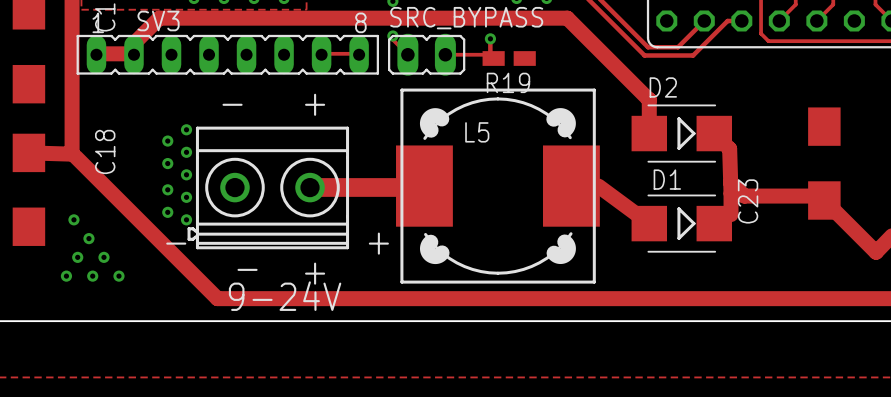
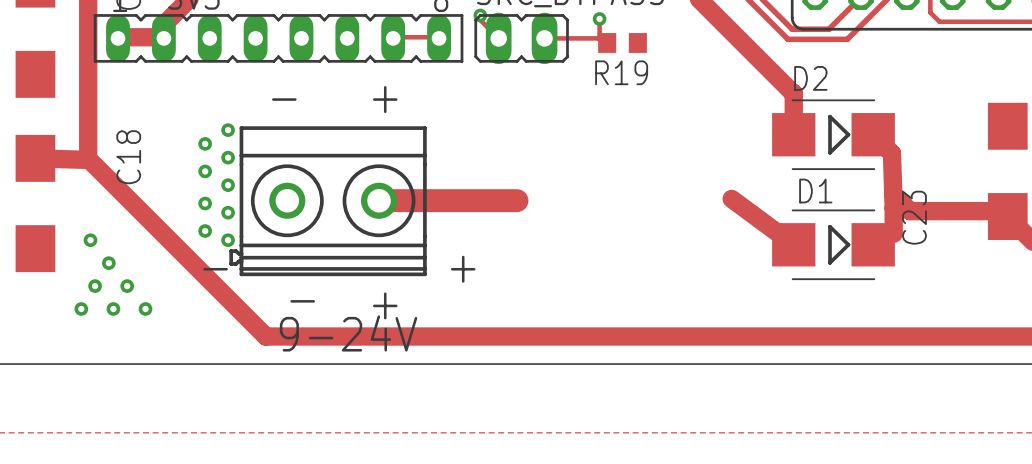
R19 footprint: [482, 51, 536, 66] -> [598, 33, 647, 53]
L5: (497, 186) -> none

